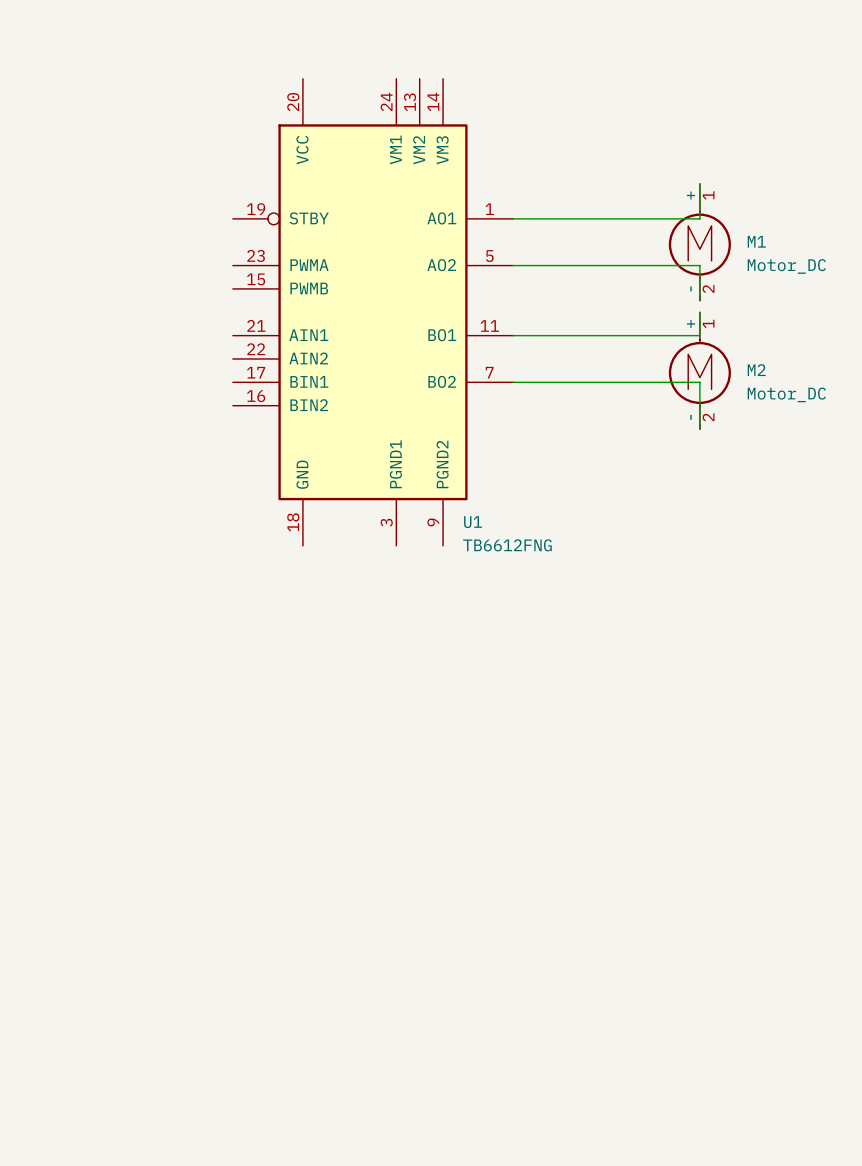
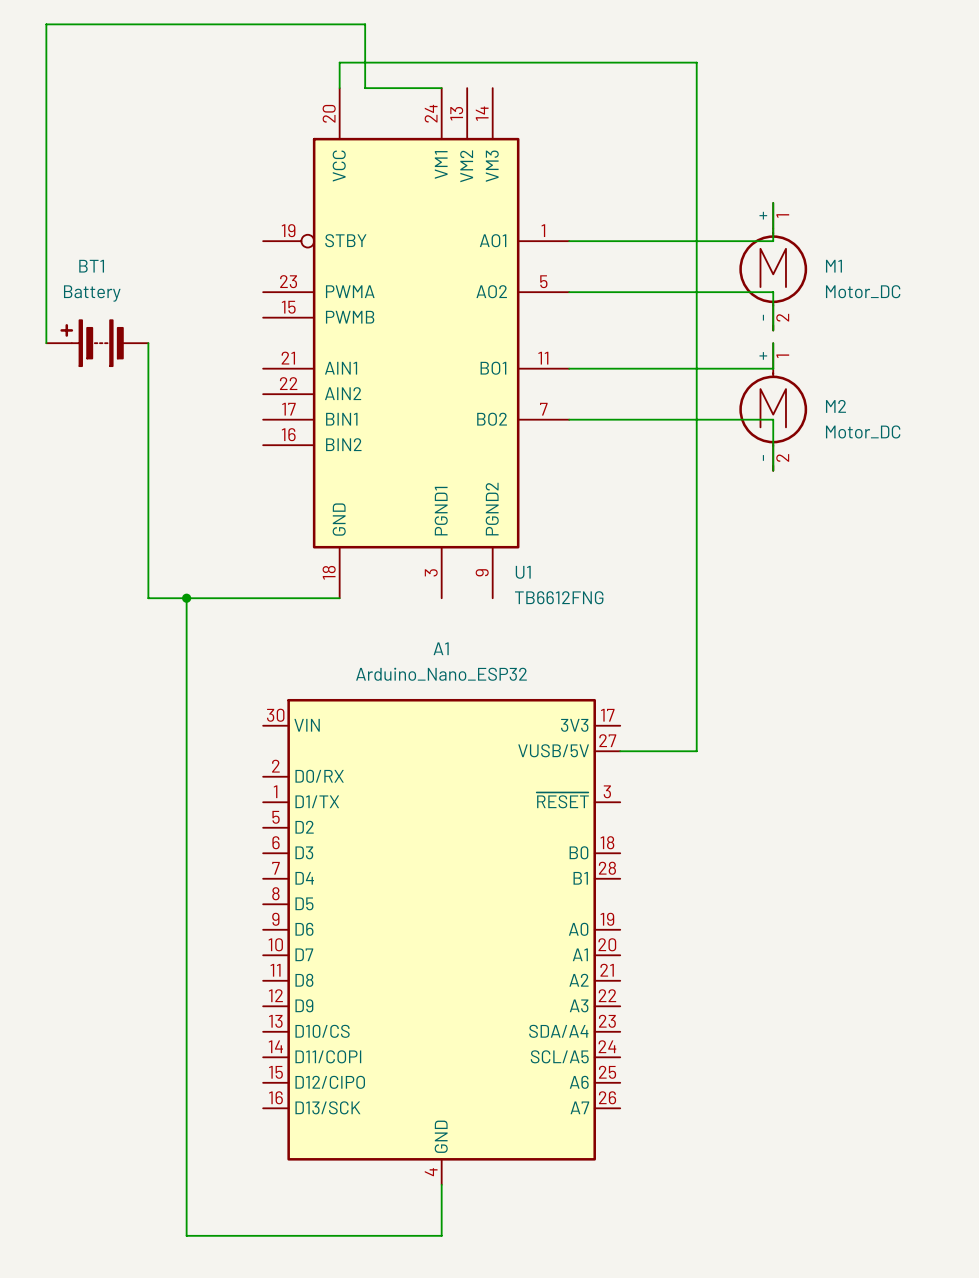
wire: none -> (339, 88) (339, 62) (696, 62) (696, 751) (620, 751)
wire: none -> (441, 88) (365, 88) (365, 24) (46, 24) (46, 343)
BT1: none -> Battery (97, 343)
wire: none -> (148, 343) (148, 598) (339, 598)
wire: none -> (186, 598) (186, 1235) (441, 1235) (441, 1184)
junction: none -> (186, 598)
A1: none -> Arduino_Nano_ESP32 (441, 941)

